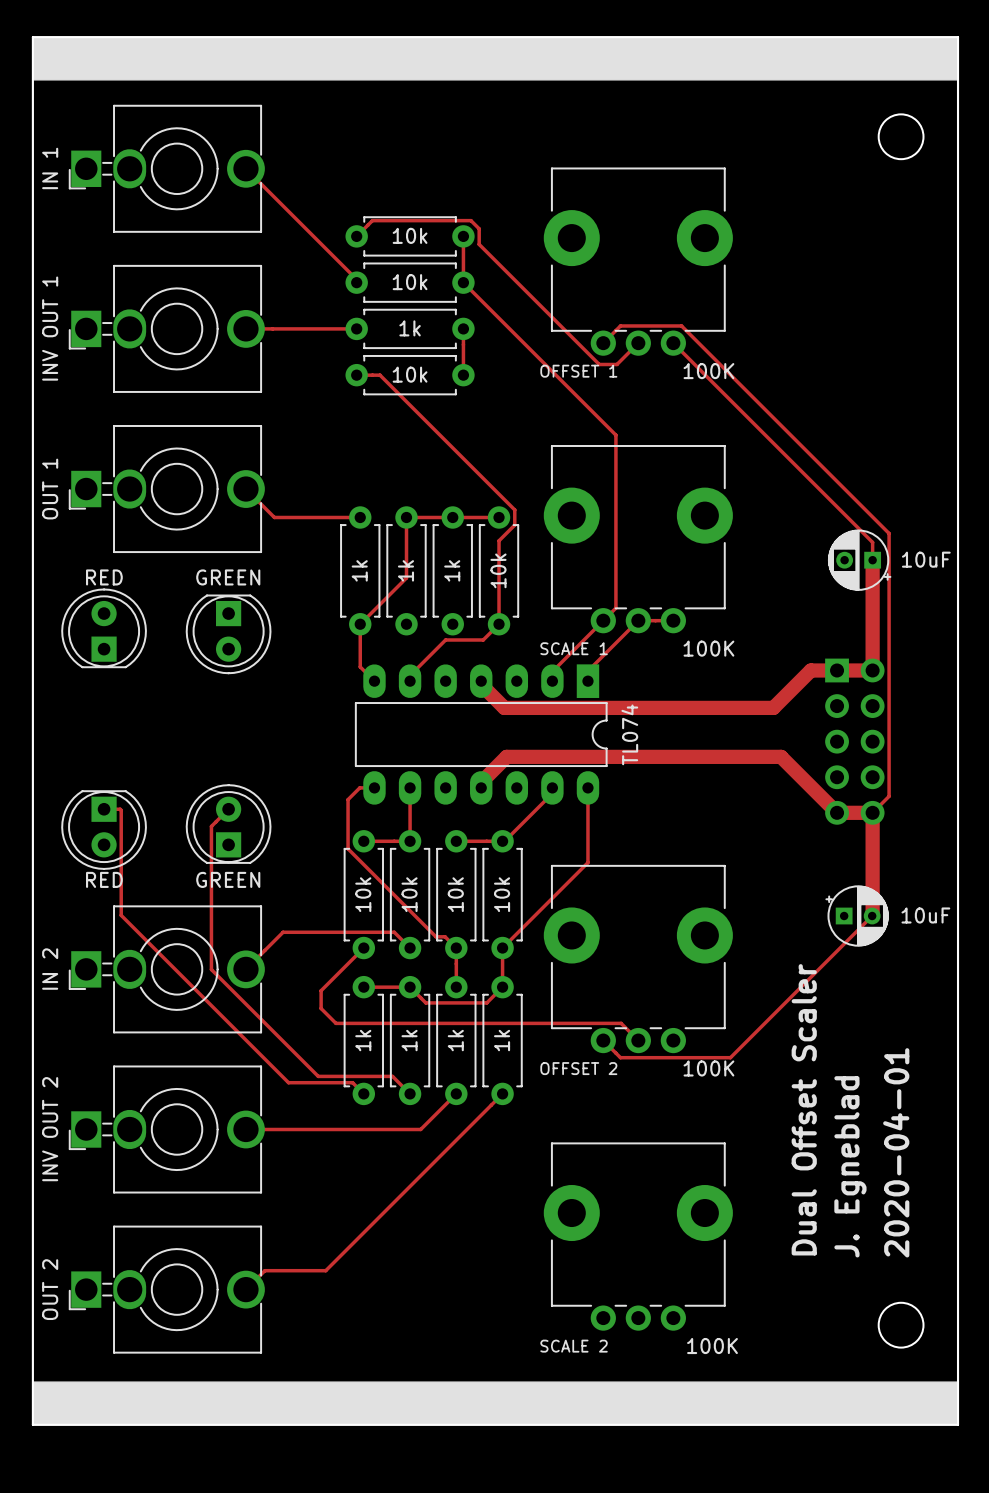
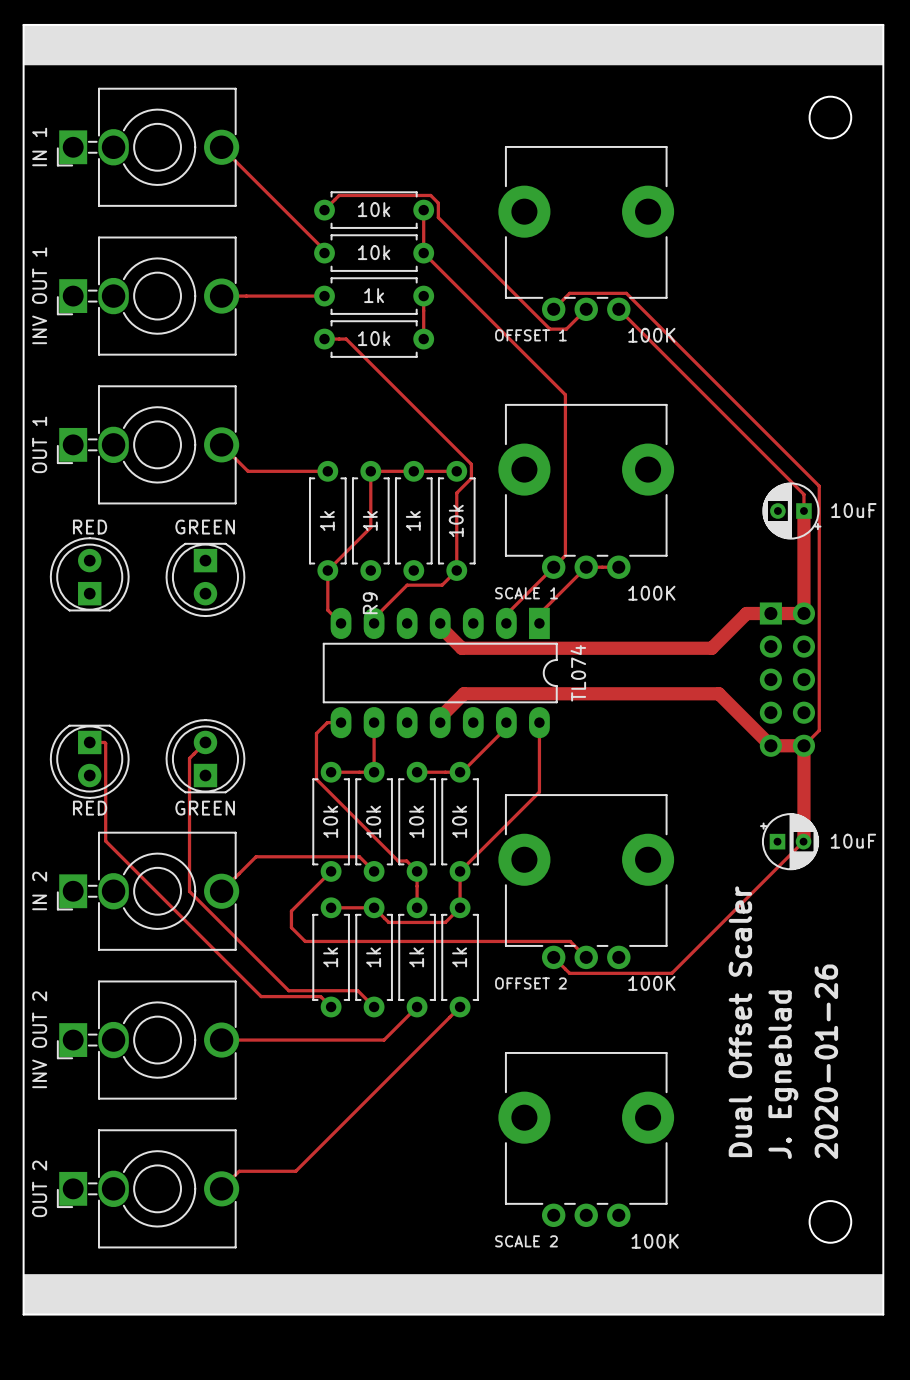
R9 name: none -> R9 (370, 603)
text: 2020-04-01 (896, 1152) -> 2020-01-26 (826, 1061)

